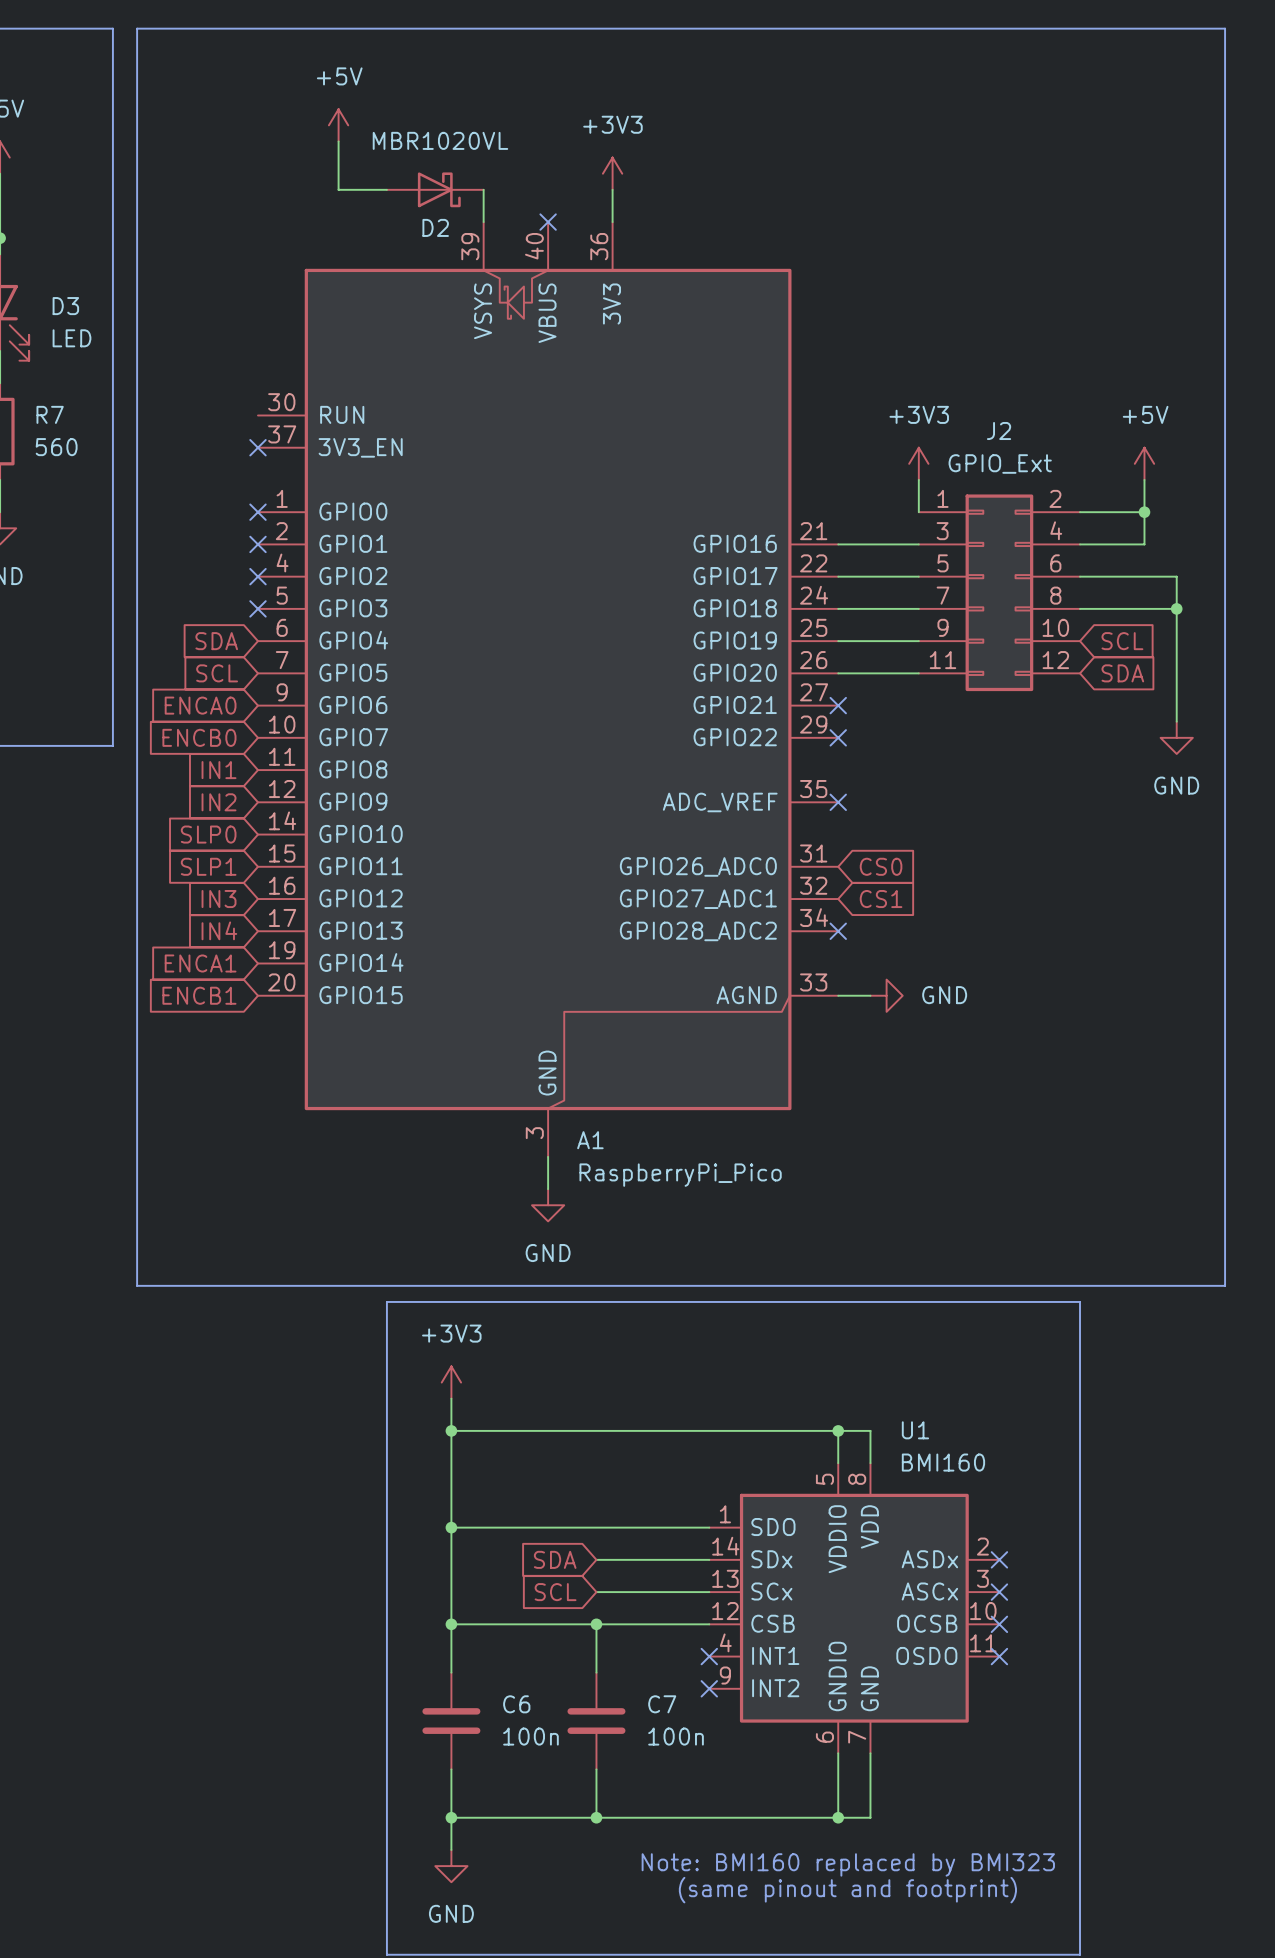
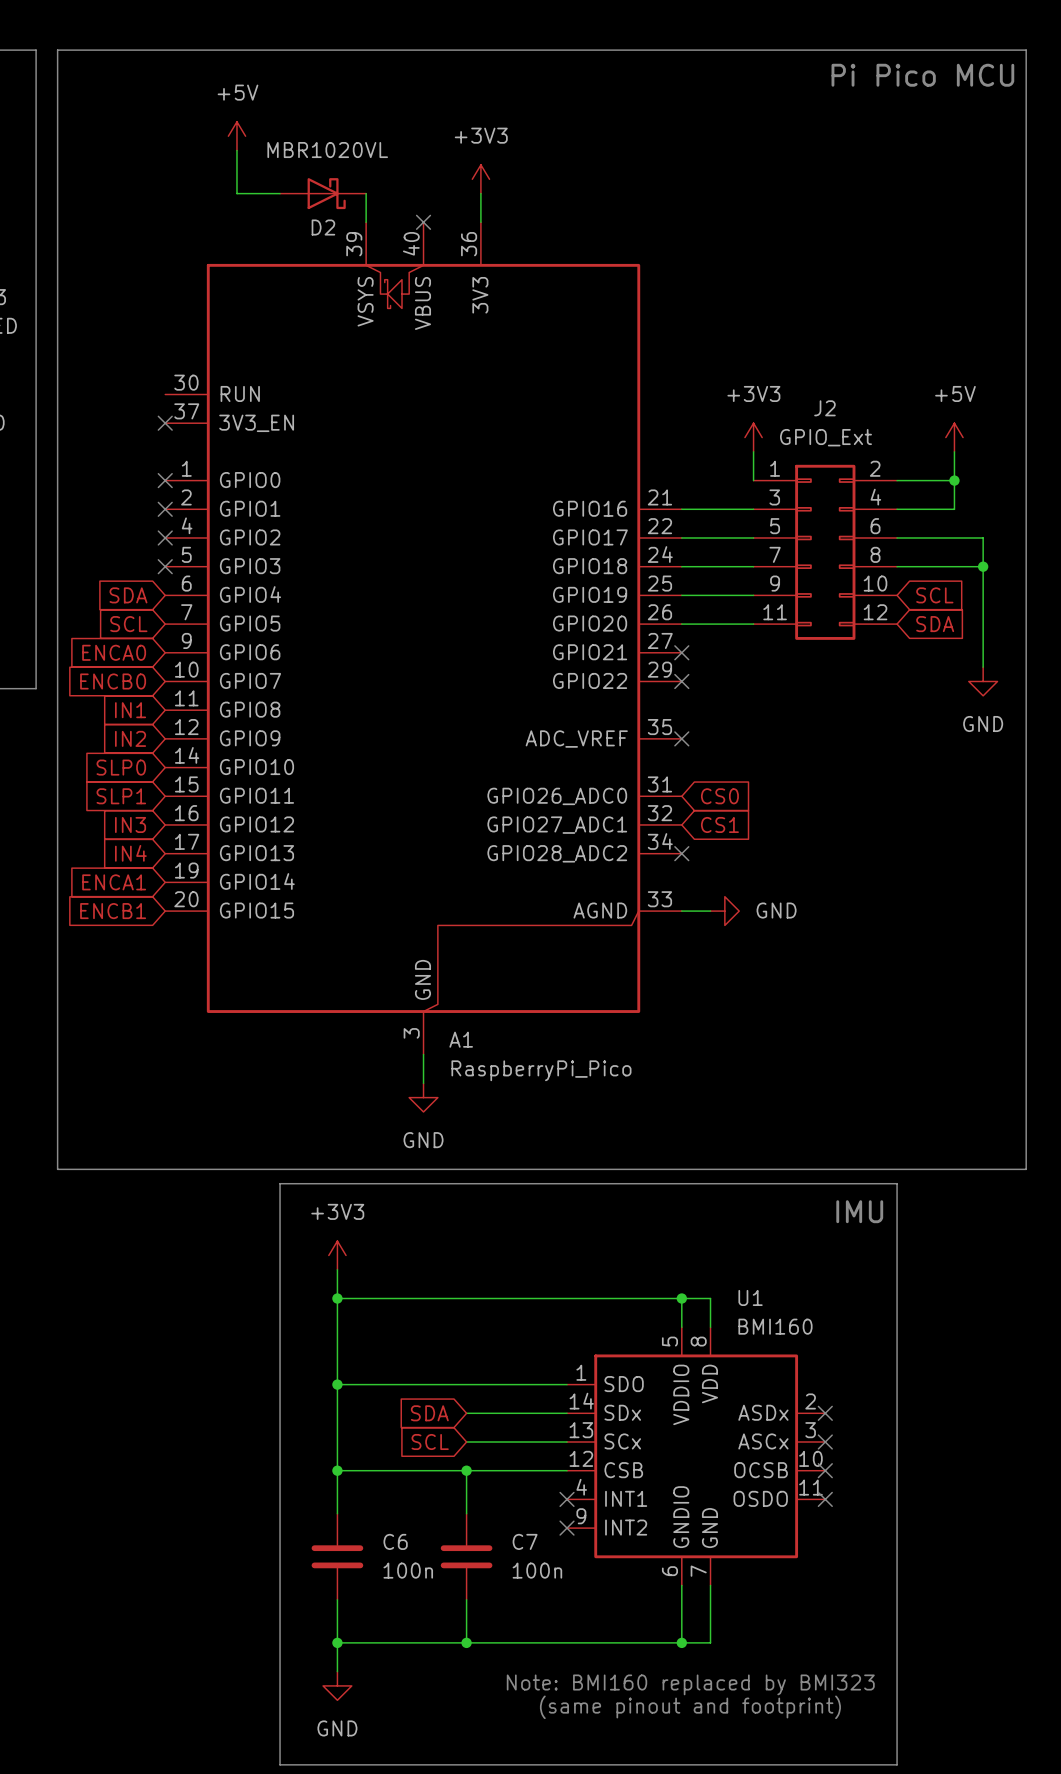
text: none -> Pi Pico MCU (922, 75)
text: none -> IMU (859, 1211)

